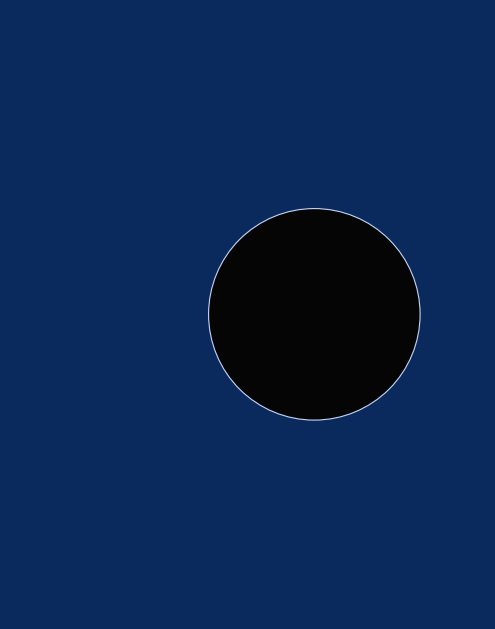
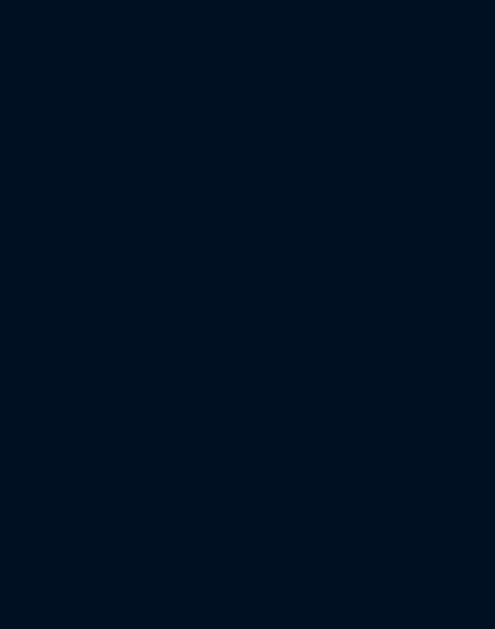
part: (314, 314) -> none

